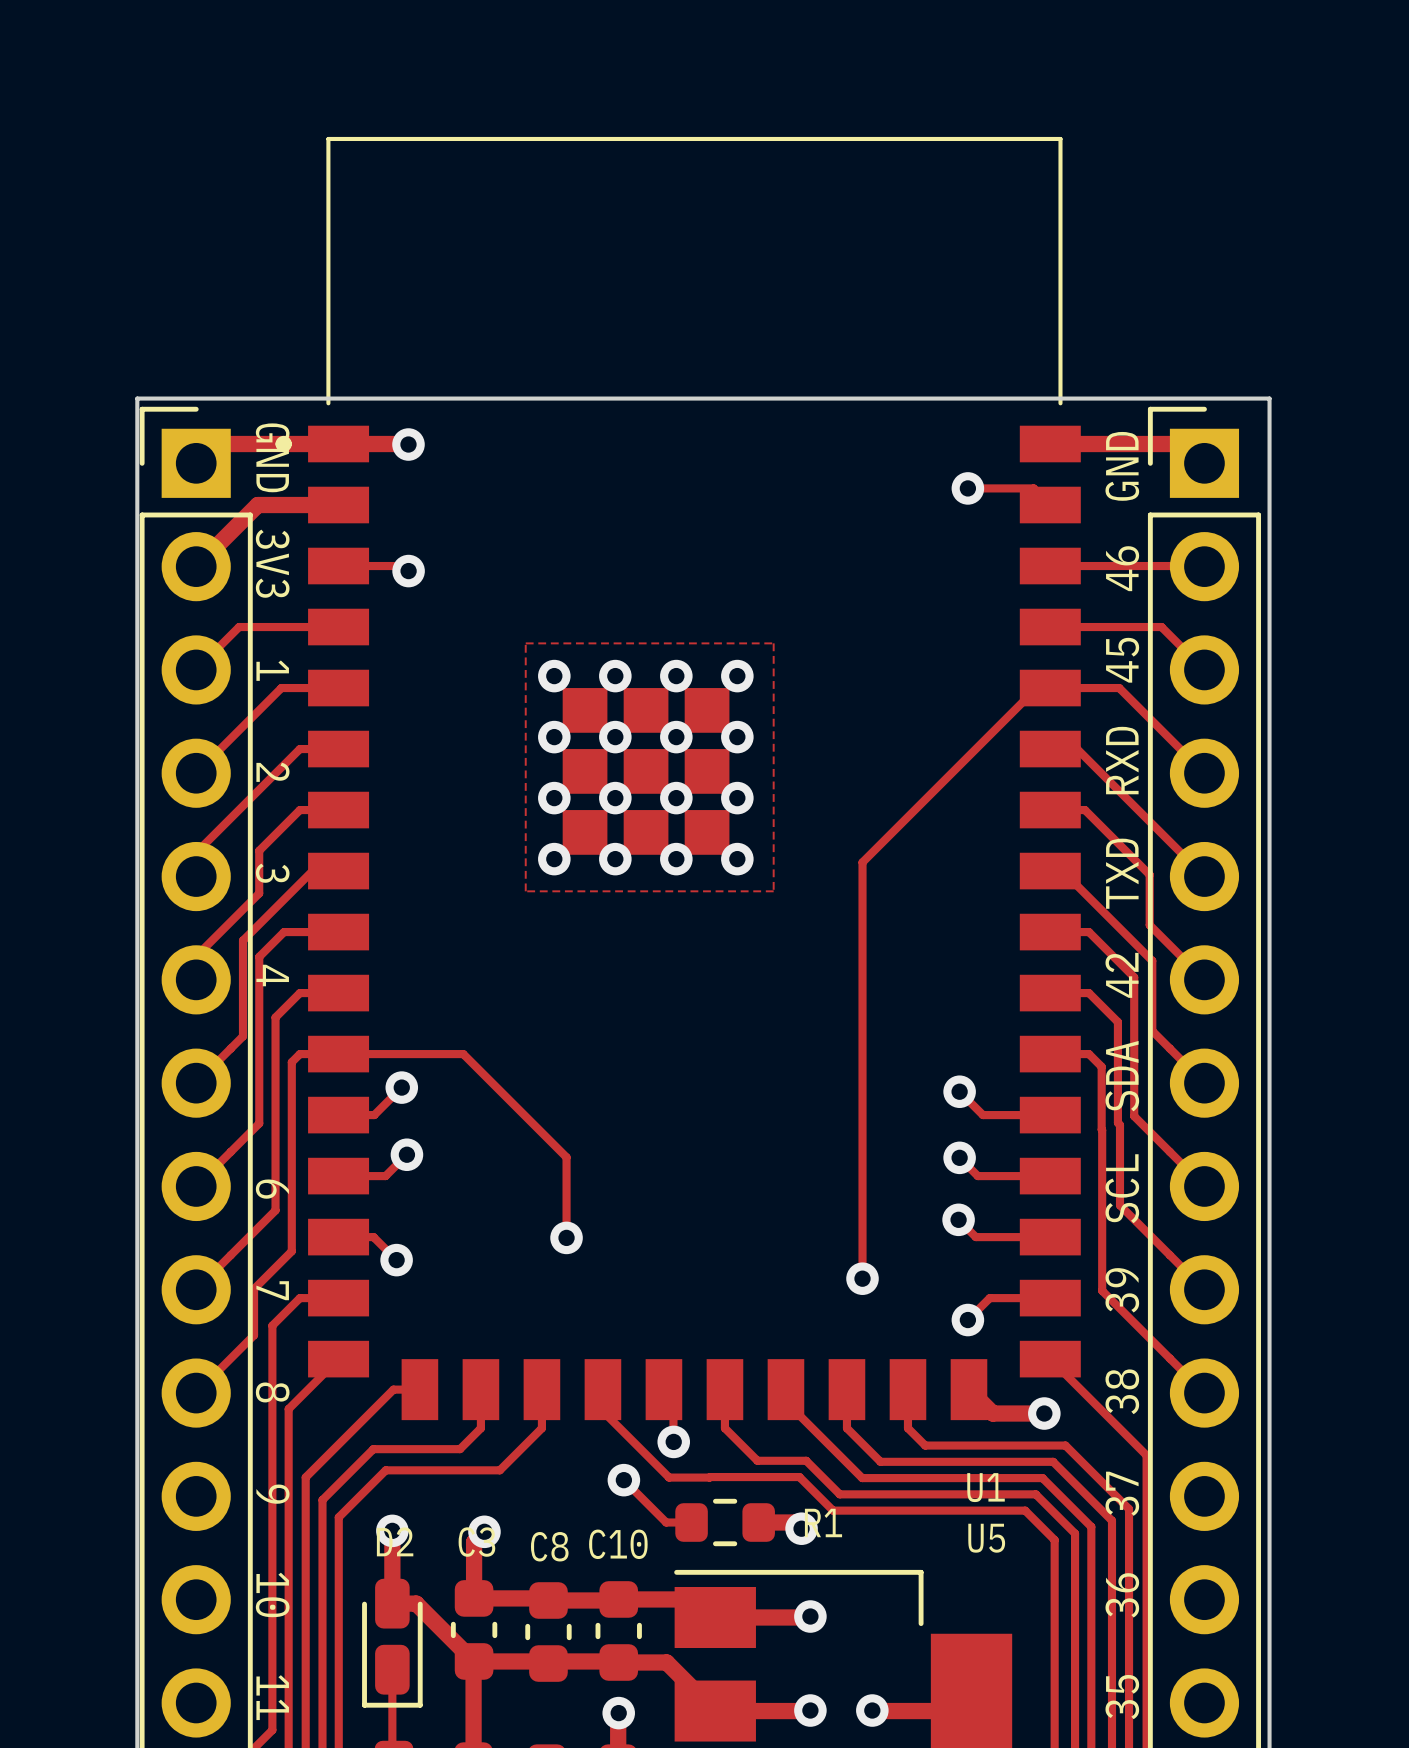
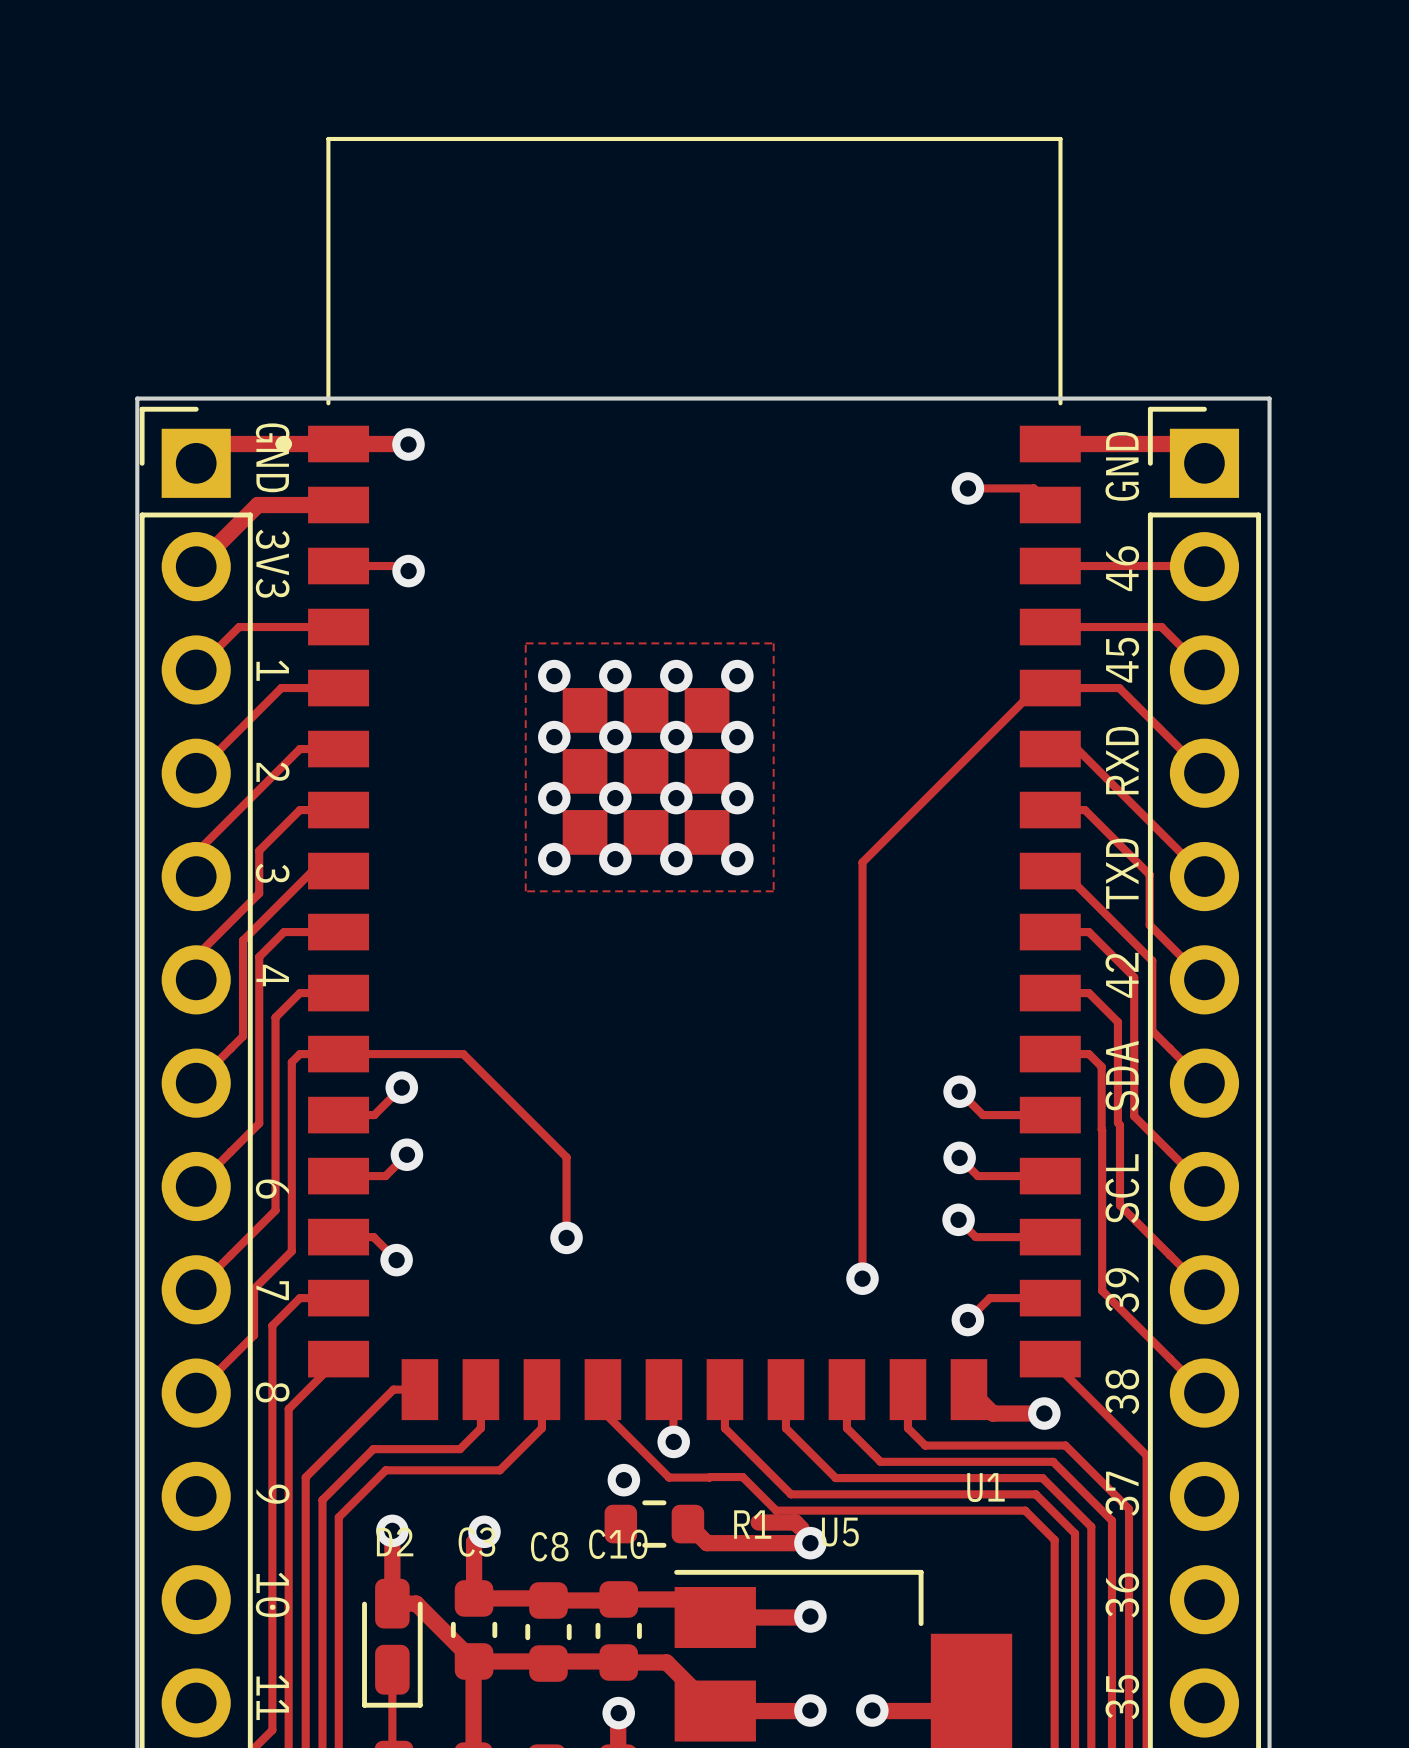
track: (785, 1401) (862, 1478) -> (785, 1401) (785, 1428) (835, 1478) (862, 1478)
track: (757, 1460) (806, 1460) (839, 1494) -> (757, 1460) (791, 1494) (839, 1494)
track: (742, 1477) (799, 1477) (833, 1510) -> (742, 1477) (776, 1510) (833, 1510)
track: (623, 1480) (666, 1522) (691, 1522) -> none
R1 position: (725, 1522) -> (654, 1524)
track: none -> (687, 1524) (707, 1543) (810, 1543)
via position: (801, 1528) -> (810, 1543)
U5 name position: U5 (986, 1538) -> U5 (840, 1532)

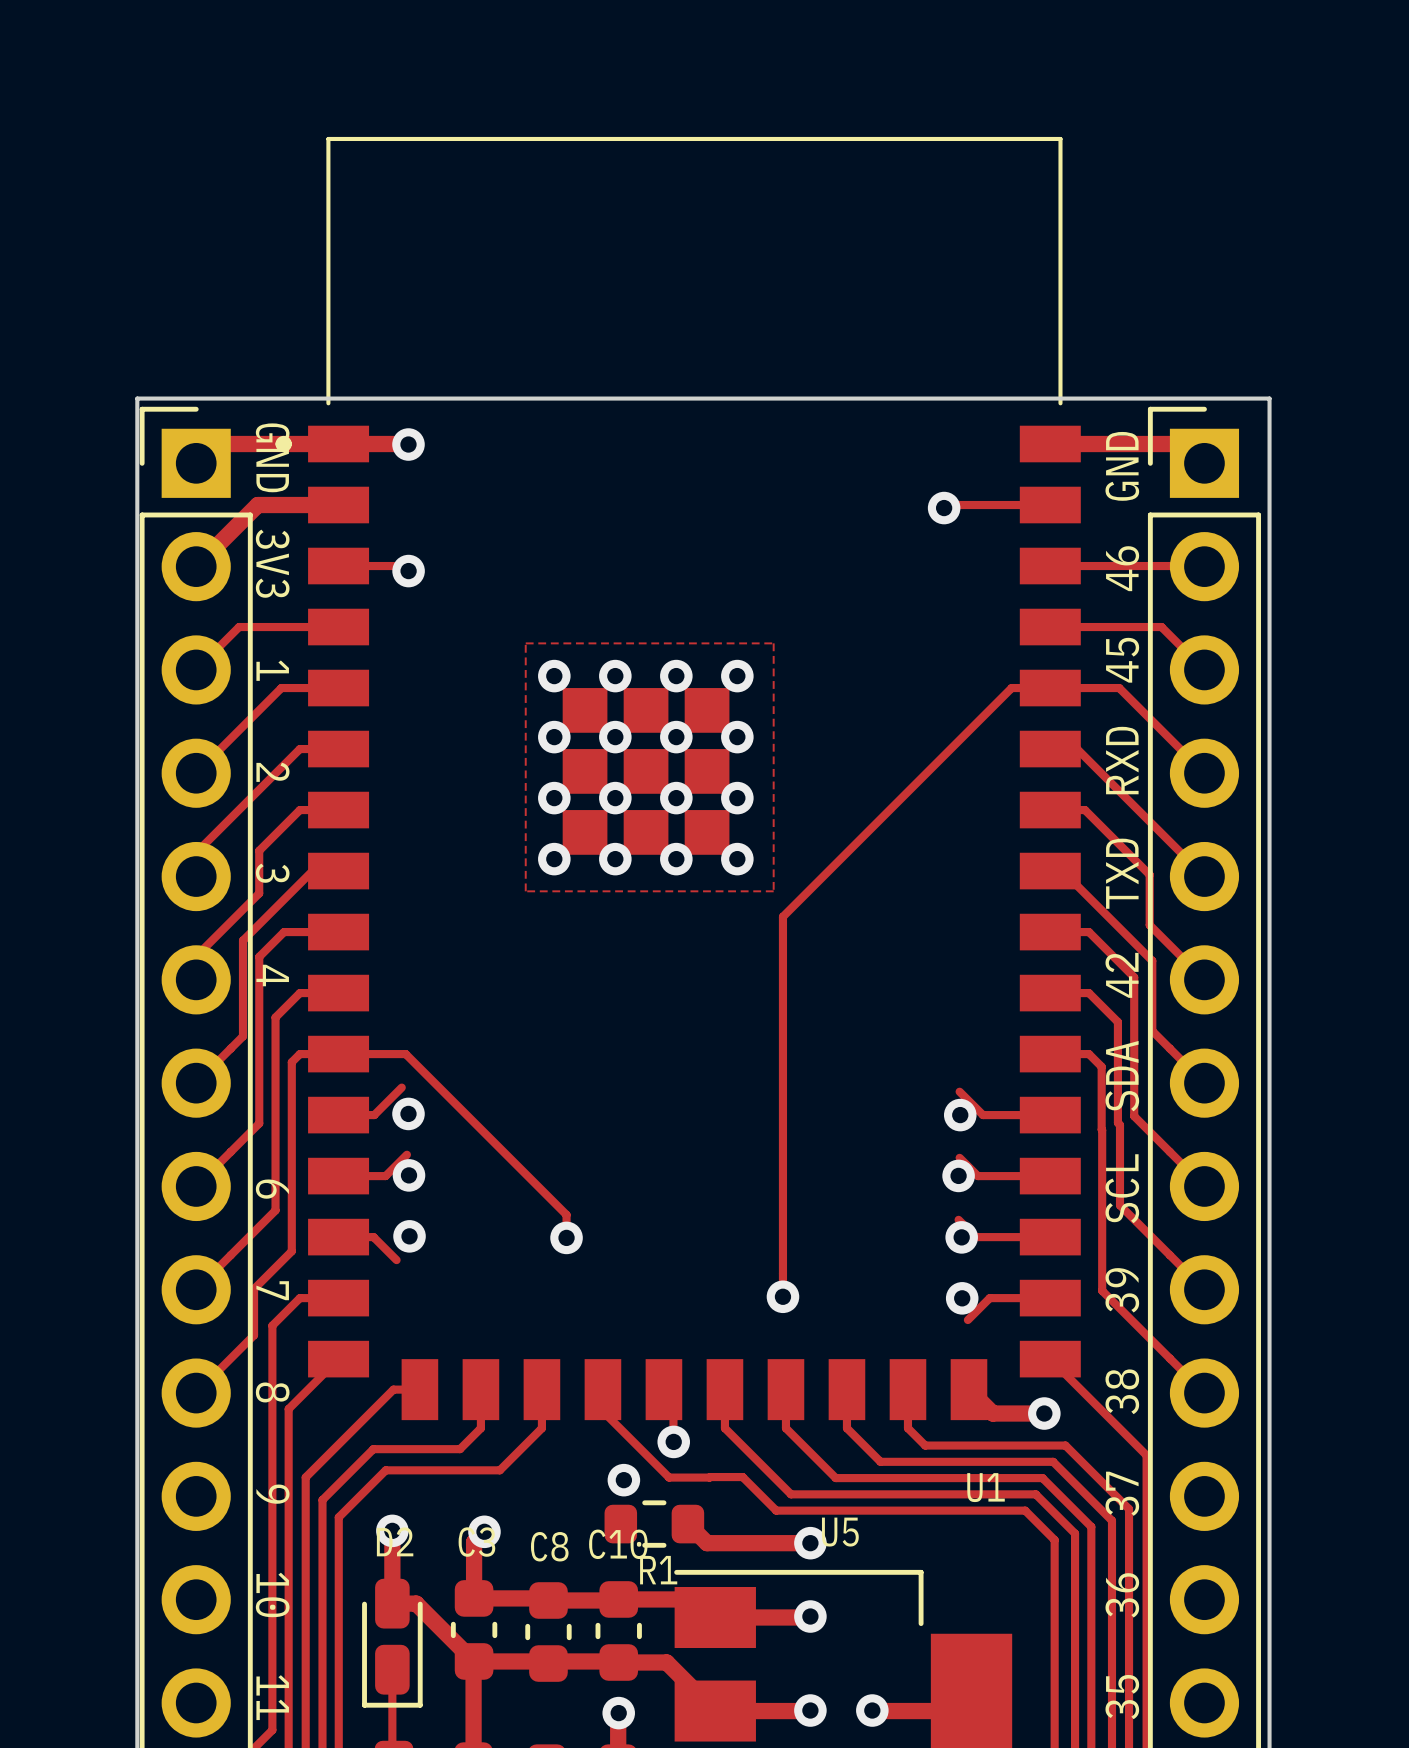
track: (967, 488) (1033, 488) (1050, 505) -> (944, 508) (947, 505) (1050, 505)
via position: (967, 488) -> (944, 508)
track: (1036, 688) (862, 862) (862, 1278) -> (1036, 688) (1011, 688) (782, 916) (782, 1296)
track: (405, 1054) (463, 1054) (566, 1157) (566, 1214) -> (405, 1054) (566, 1214)
via position: (401, 1087) -> (408, 1113)
via position: (959, 1091) -> (960, 1115)
via position: (406, 1154) -> (409, 1175)
via position: (959, 1157) -> (958, 1175)
via position: (958, 1219) -> (961, 1237)
via position: (396, 1260) -> (409, 1236)
via: (862, 1278) -> none
via: none -> (782, 1296)
via position: (967, 1320) -> (962, 1298)
track: (758, 1522) (795, 1522) (801, 1528) -> none
R1 name position: R1 (752, 1524) -> R1 (658, 1570)

